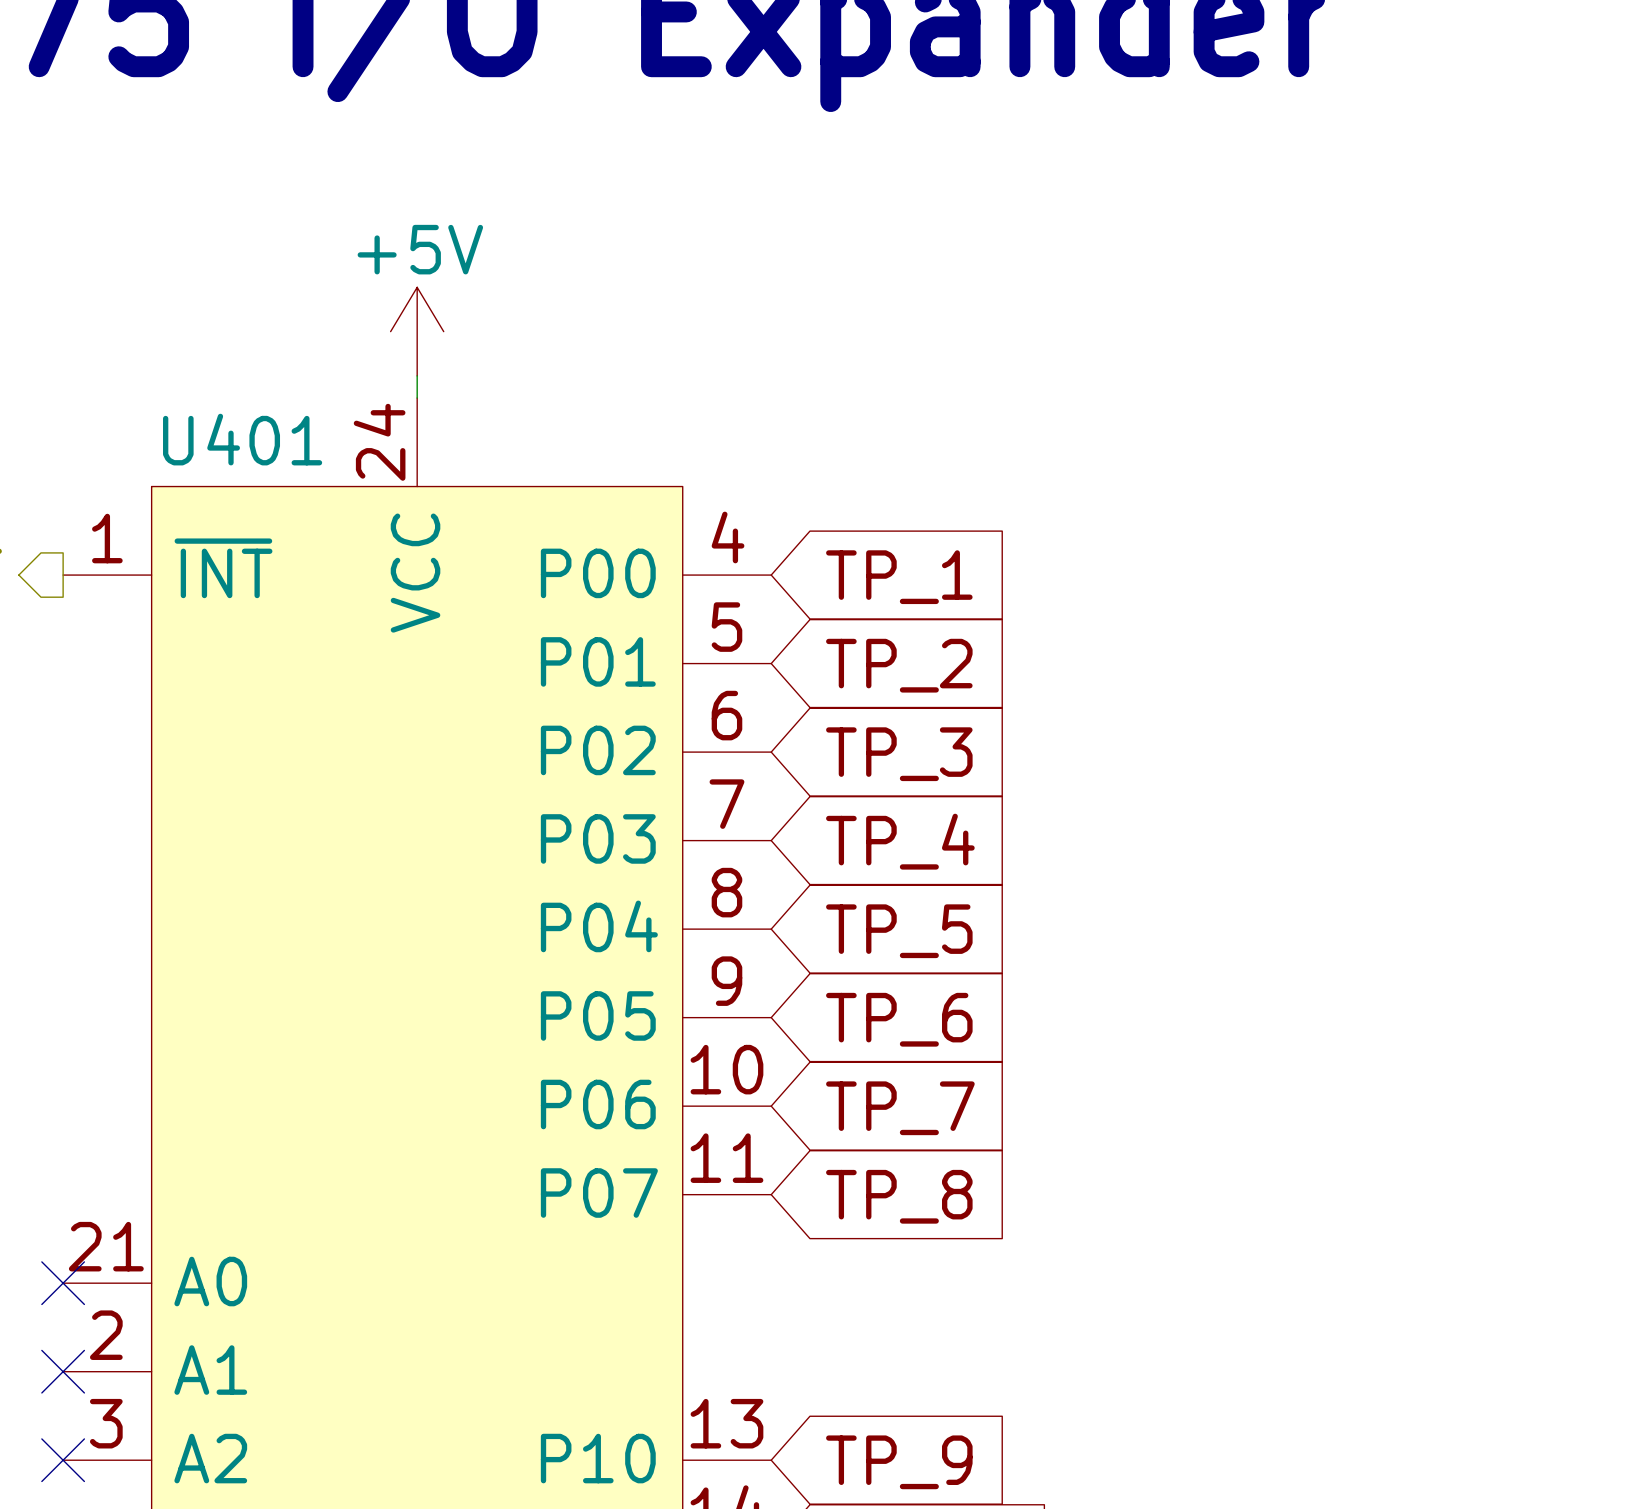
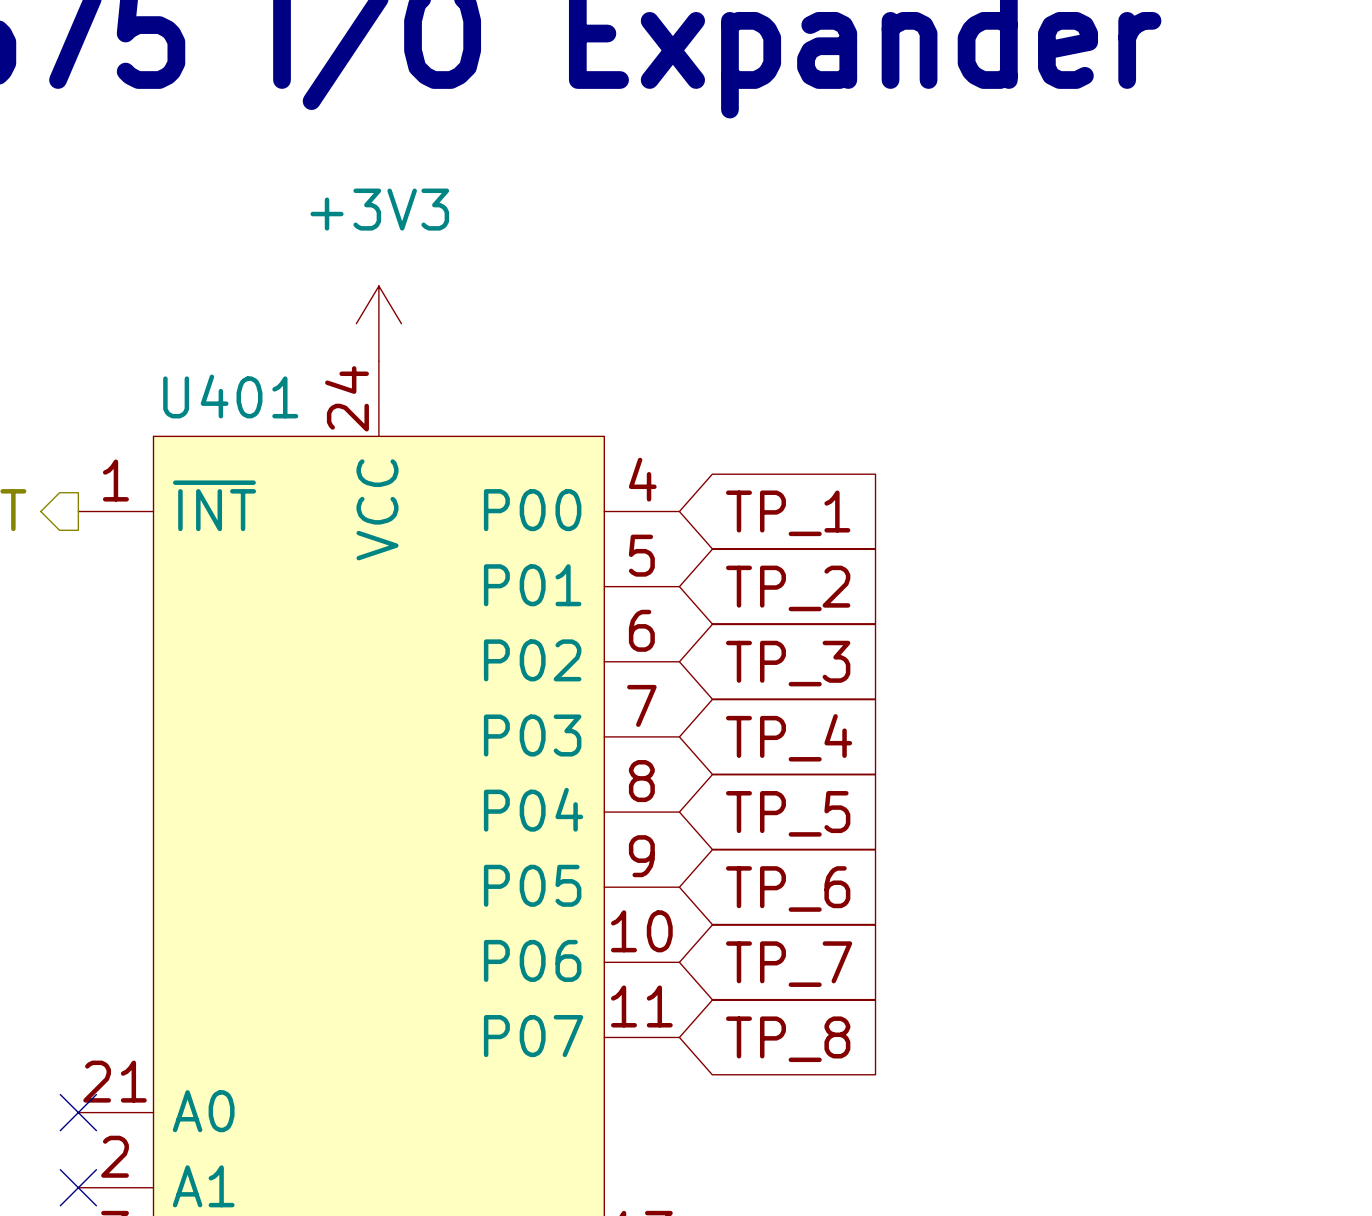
power symbol: +5V (417, 331) -> +3V3 (378, 323)

